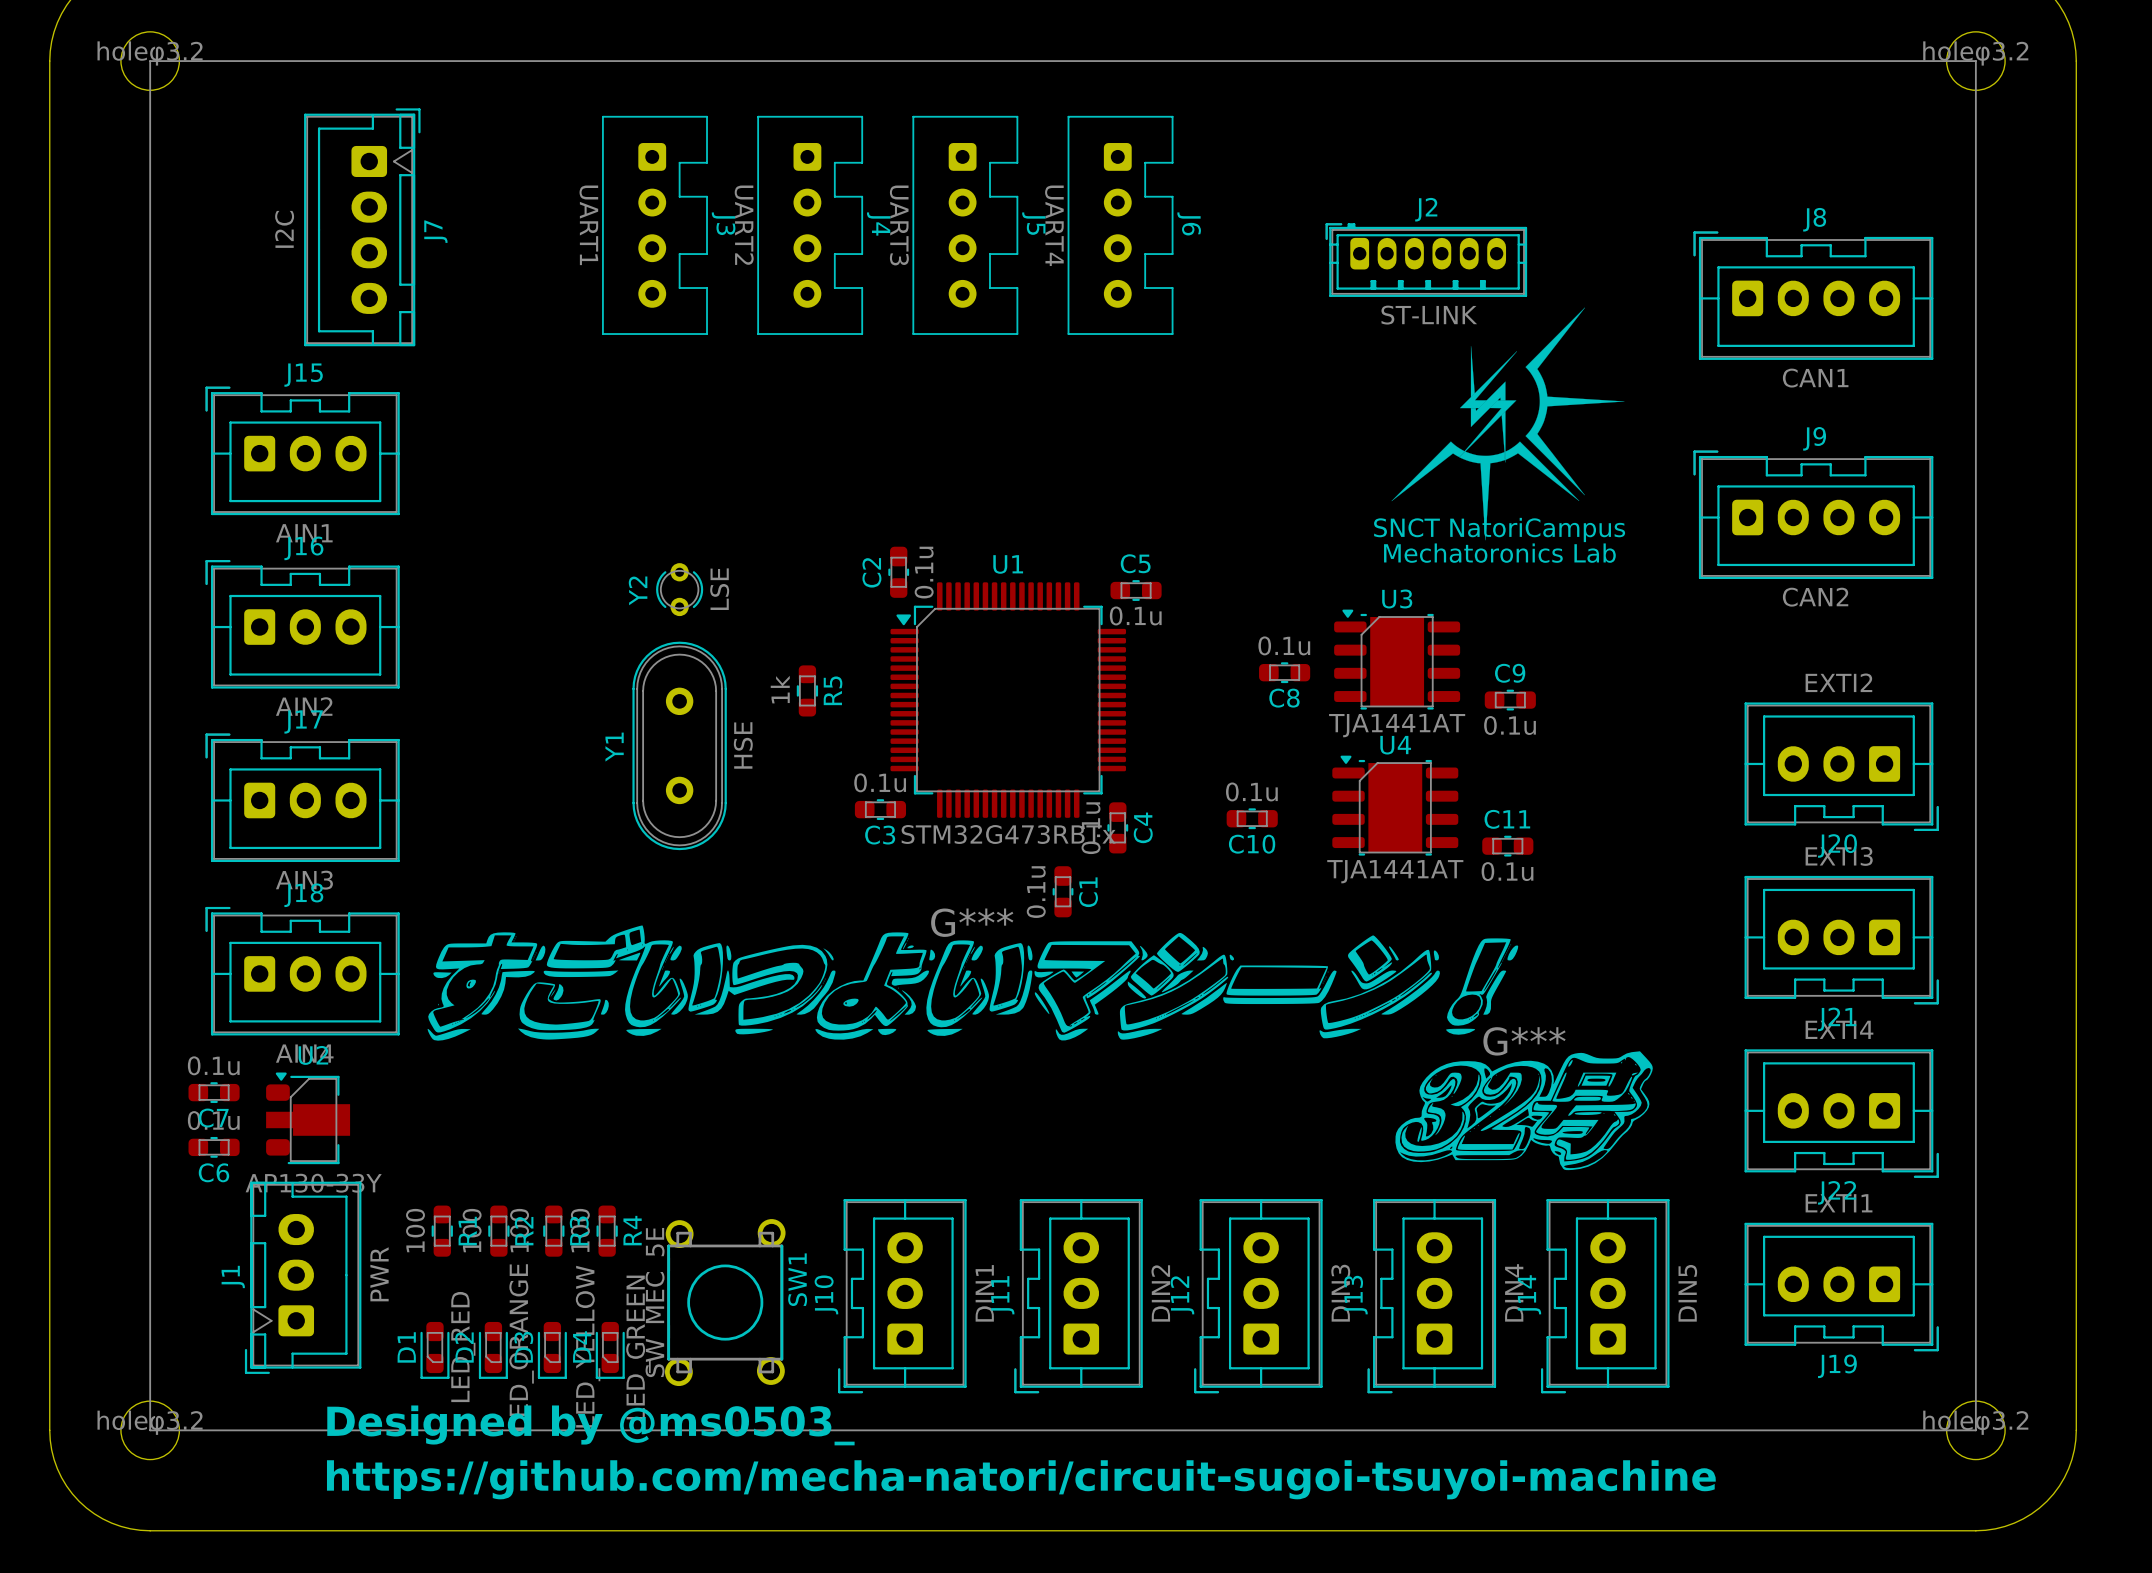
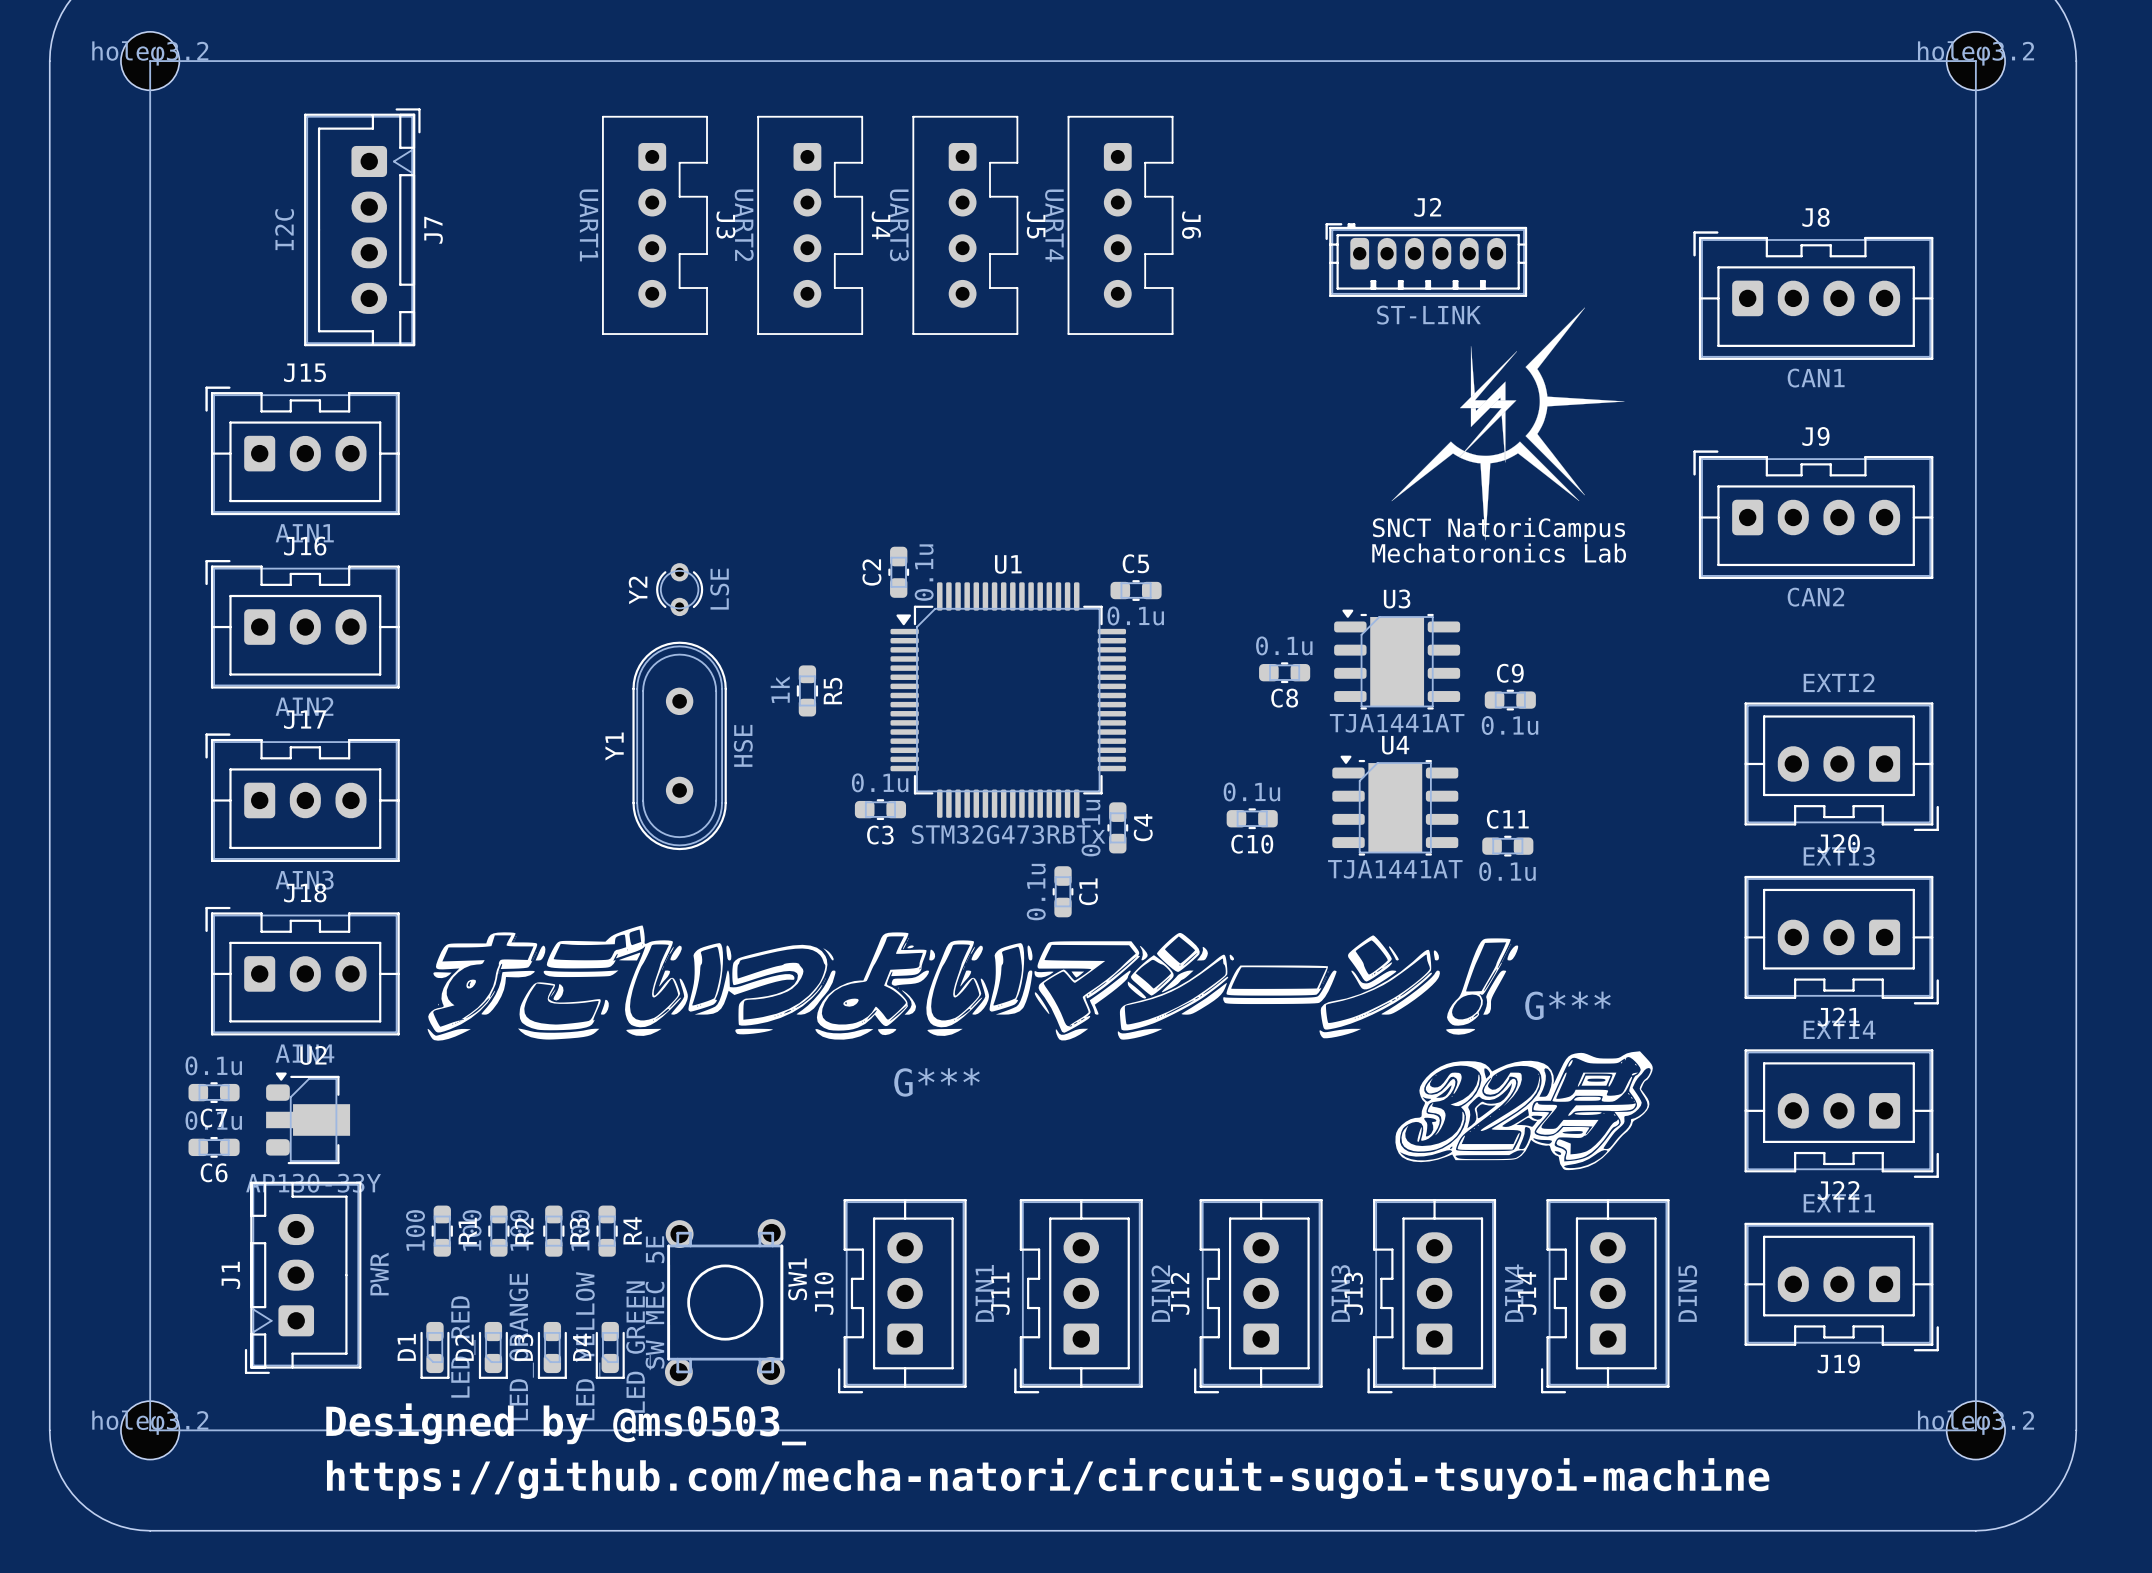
G*** name position: G*** (972, 922) -> G*** (937, 1082)
G*** name position: G*** (1524, 1041) -> G*** (1568, 1005)

